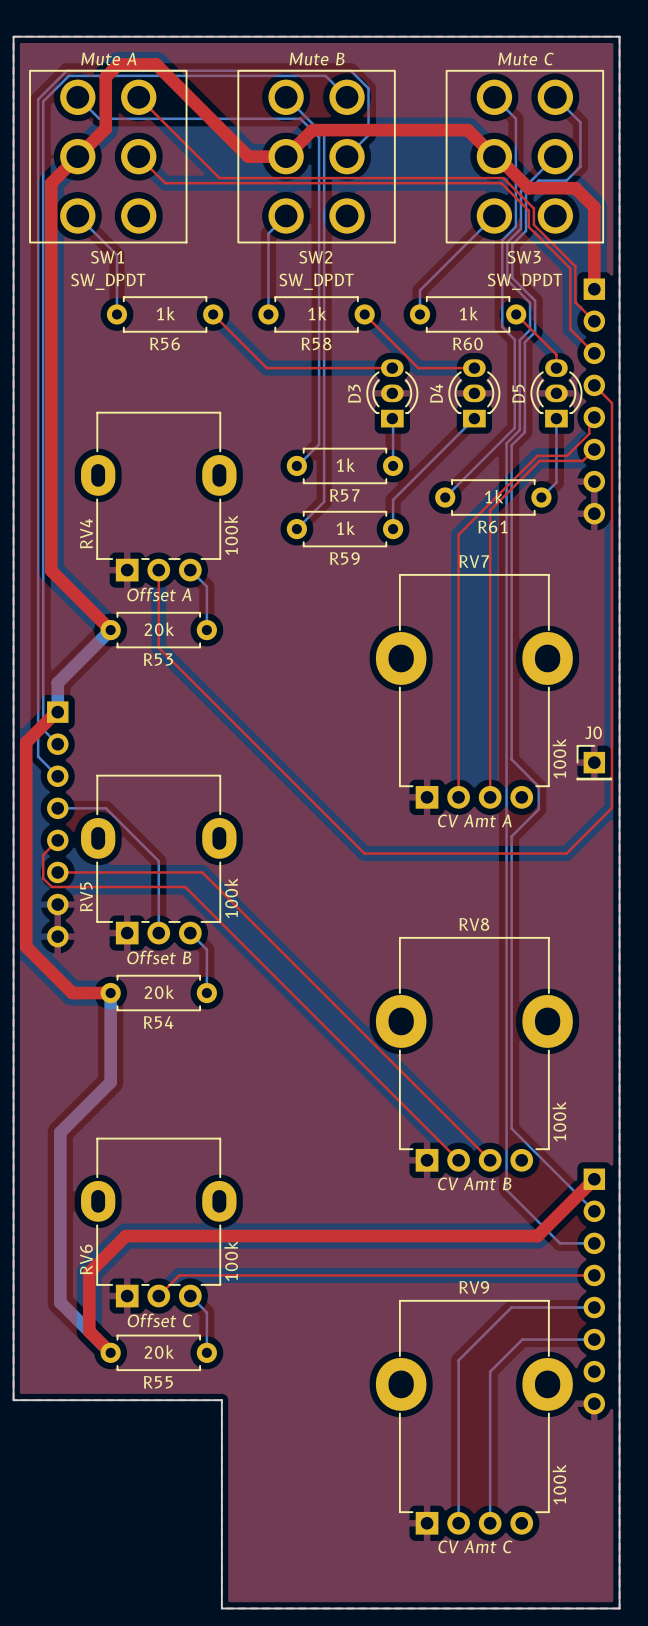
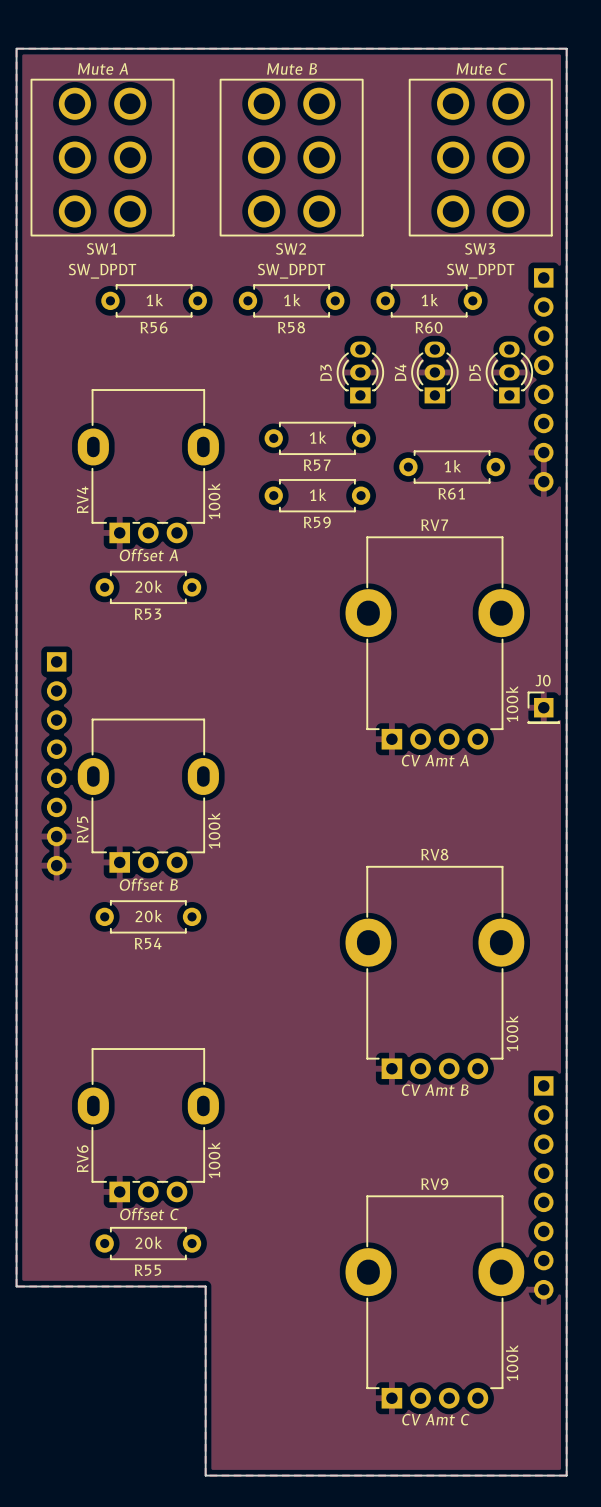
bottom track: (77, 97) (99, 118) (300, 118) (319, 137) (319, 444) (296, 465) -> none
top track: (138, 97) (219, 178) (503, 178) (533, 208) (533, 224) (575, 266) (575, 302) (594, 321) -> none
bottom track: (286, 97) (324, 135) (324, 501) (296, 529) -> none
bottom track: (347, 97) (325, 75) (68, 75) (43, 101) (43, 729) (57, 744) -> none
bottom track: (494, 97) (515, 118) (515, 226) (502, 240) (502, 327) (514, 339) (514, 427) (445, 497) -> none
bottom track: (555, 97) (580, 122) (580, 166) (566, 180) (538, 180) (526, 193) (526, 230) (512, 244) (512, 277) (535, 300) (535, 331) (524, 342) (524, 432) (511, 445) (511, 759) (538, 786) (538, 809) (511, 836) (511, 1128) (594, 1211) -> none
top track: (138, 156) (165, 183) (501, 183) (528, 210) (528, 226) (570, 268) (570, 329) (594, 353) -> none
bottom track: (347, 156) (368, 135) (368, 88) (350, 70) (66, 70) (38, 99) (38, 756) (57, 776) -> none
bottom track: (555, 156) (520, 191) (520, 228) (507, 242) (507, 280) (530, 302) (530, 329) (519, 340) (519, 430) (506, 443) (506, 1189) (559, 1243) (594, 1243) -> none
bottom track: (77, 215) (116, 255) (116, 314) -> none
bottom track: (286, 215) (268, 233) (268, 314) -> none
bottom track: (494, 215) (419, 290) (419, 314) -> none
top track: (594, 289) (594, 207) (575, 188) (528, 188) (467, 130) (312, 130) (286, 156) (248, 156) (156, 64) (118, 64) (105, 77) (105, 128) (51, 183) (51, 570) (110, 630) -> none
top track: (213, 314) (266, 368) (392, 368) -> none
top track: (364, 314) (418, 368) (474, 368) -> none
top track: (516, 314) (556, 354) (556, 368) -> none
top track: (594, 385) (611, 403) (611, 808) (566, 853) (364, 853) (158, 647) (158, 570) -> none
top track: (594, 417) (589, 422) (589, 433) (567, 455) (537, 455) (458, 534) (458, 797) -> none
bottom track: (392, 418) (393, 465) -> none
bottom track: (474, 418) (393, 499) (393, 529) -> none
bottom track: (556, 418) (556, 482) (541, 497) -> none
top track: (594, 449) (582, 460) (539, 460) (490, 510) (490, 797) -> none
bottom track: (190, 570) (206, 586) (206, 630) -> none
bottom track: (110, 630) (57, 682) (57, 712) -> none
top track: (57, 712) (26, 742) (26, 946) (72, 993) (110, 993) -> none
bottom track: (57, 808) (106, 808) (158, 861) (158, 933) -> none
top track: (57, 840) (43, 854) (43, 878) (51, 887) (185, 887) (458, 1160) -> none
top track: (57, 872) (202, 872) (490, 1160) -> none
bottom track: (190, 933) (206, 949) (206, 993) -> none
bottom track: (110, 993) (110, 1082) (60, 1132) (60, 1302) (110, 1352) -> none
top track: (594, 1179) (537, 1236) (125, 1236) (89, 1272) (89, 1331) (110, 1352) -> none
top track: (594, 1275) (179, 1275) (158, 1296) -> none
bottom track: (190, 1296) (206, 1312) (206, 1352) -> none
bottom track: (594, 1307) (511, 1307) (458, 1360) (458, 1523) -> none
bottom track: (594, 1339) (522, 1339) (490, 1371) (490, 1523) -> none

